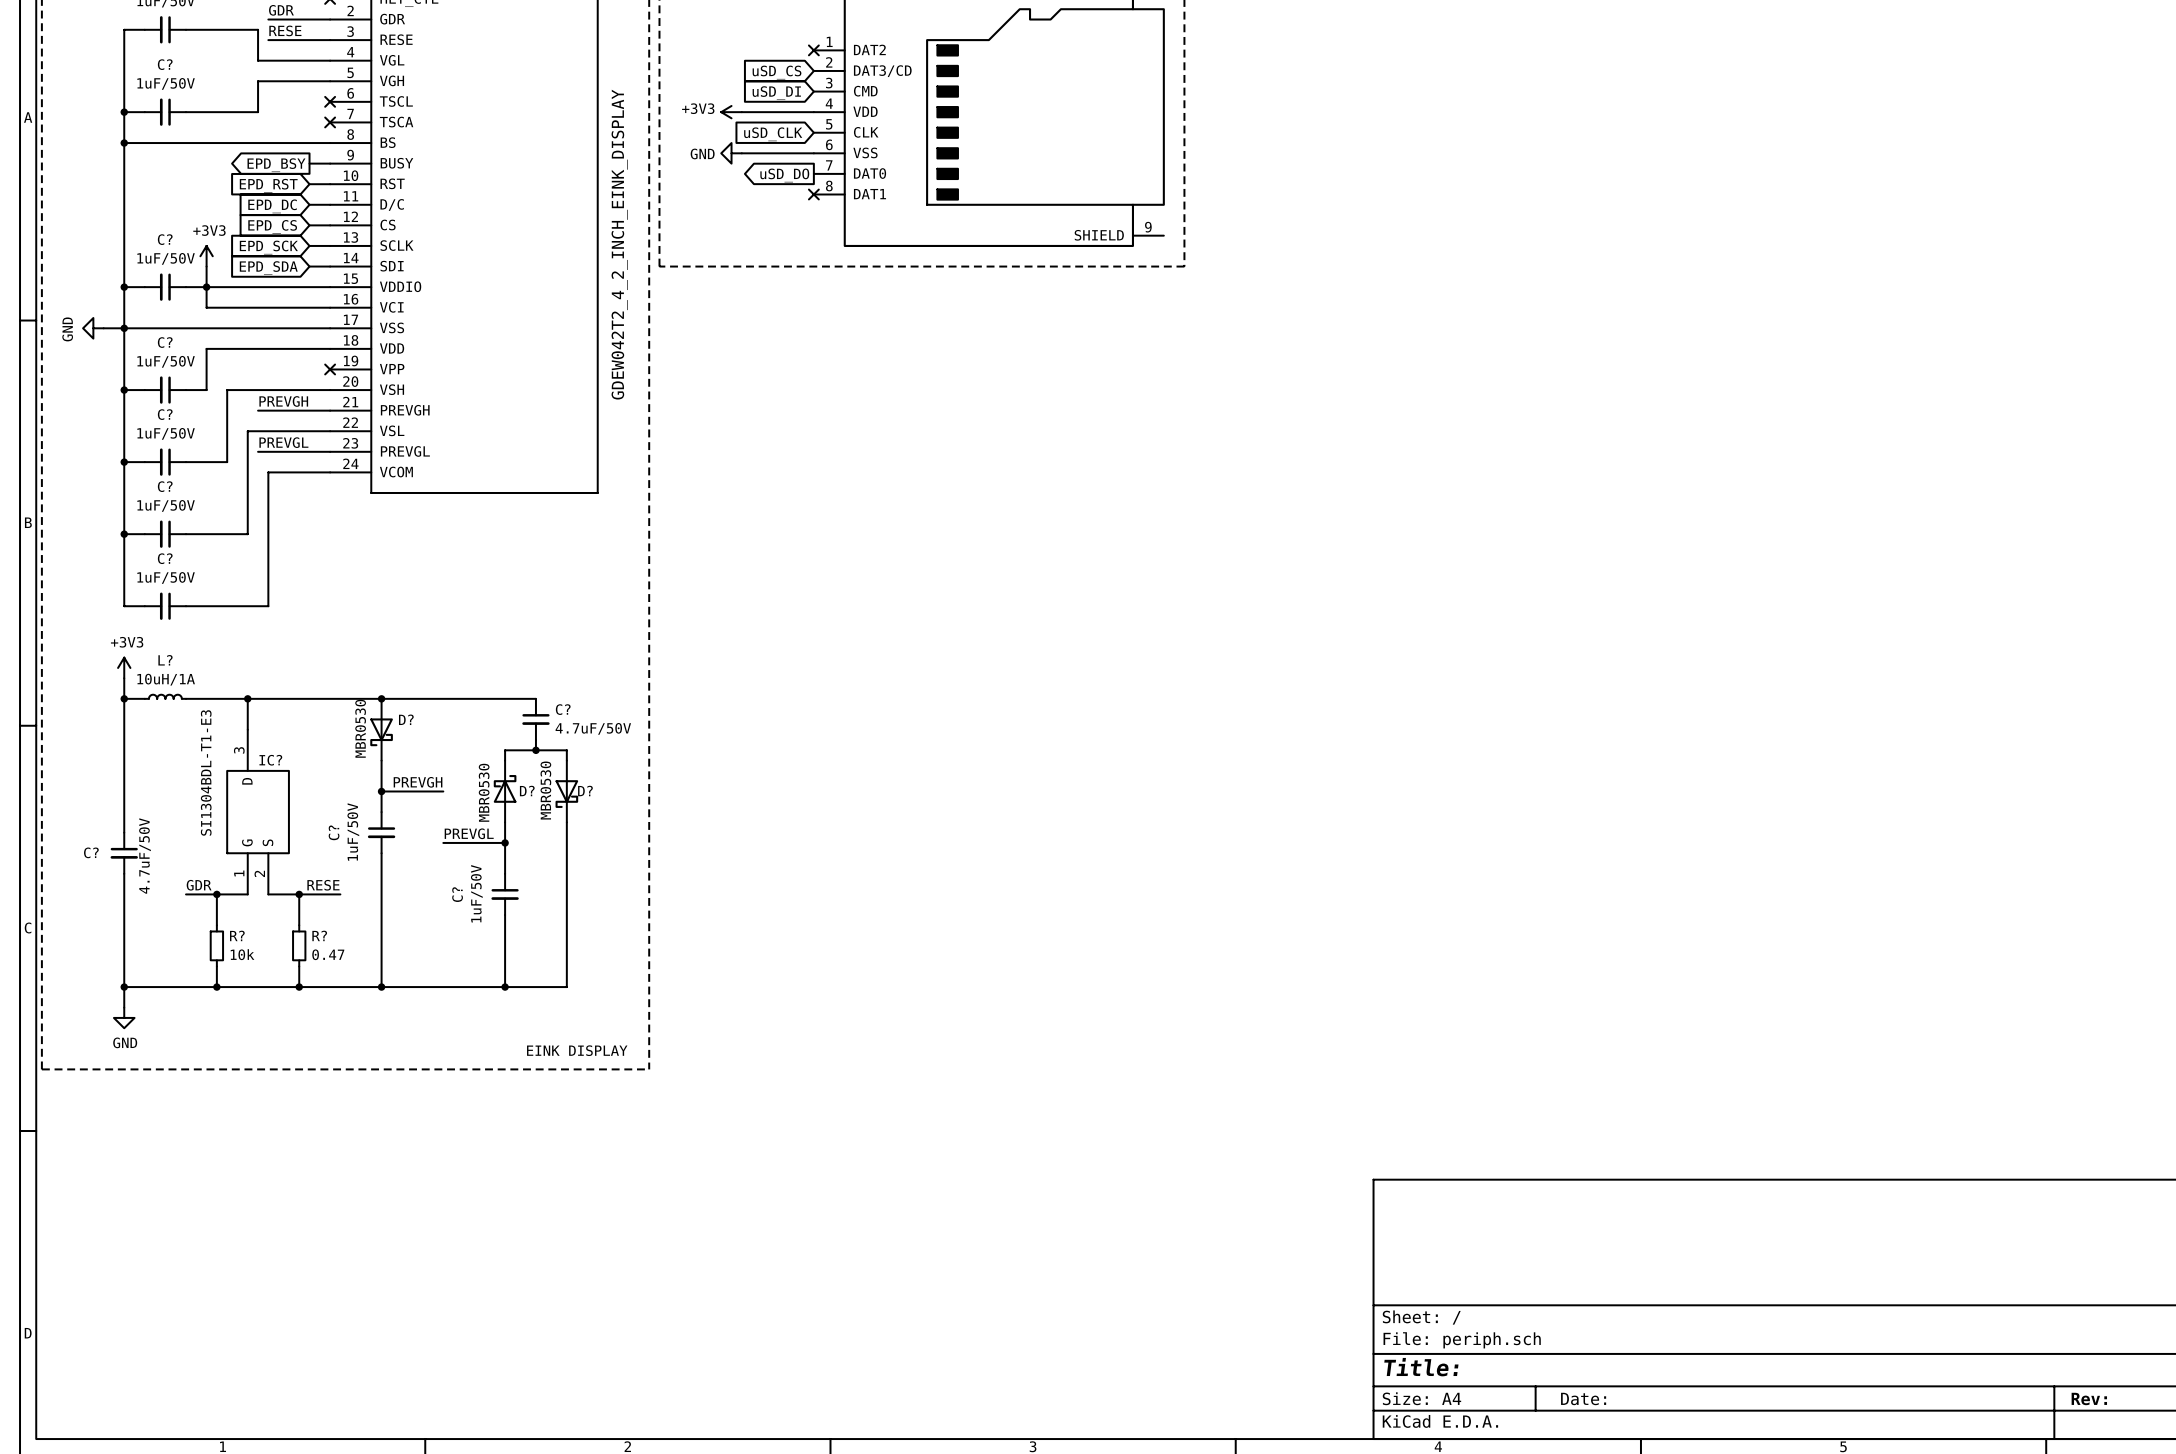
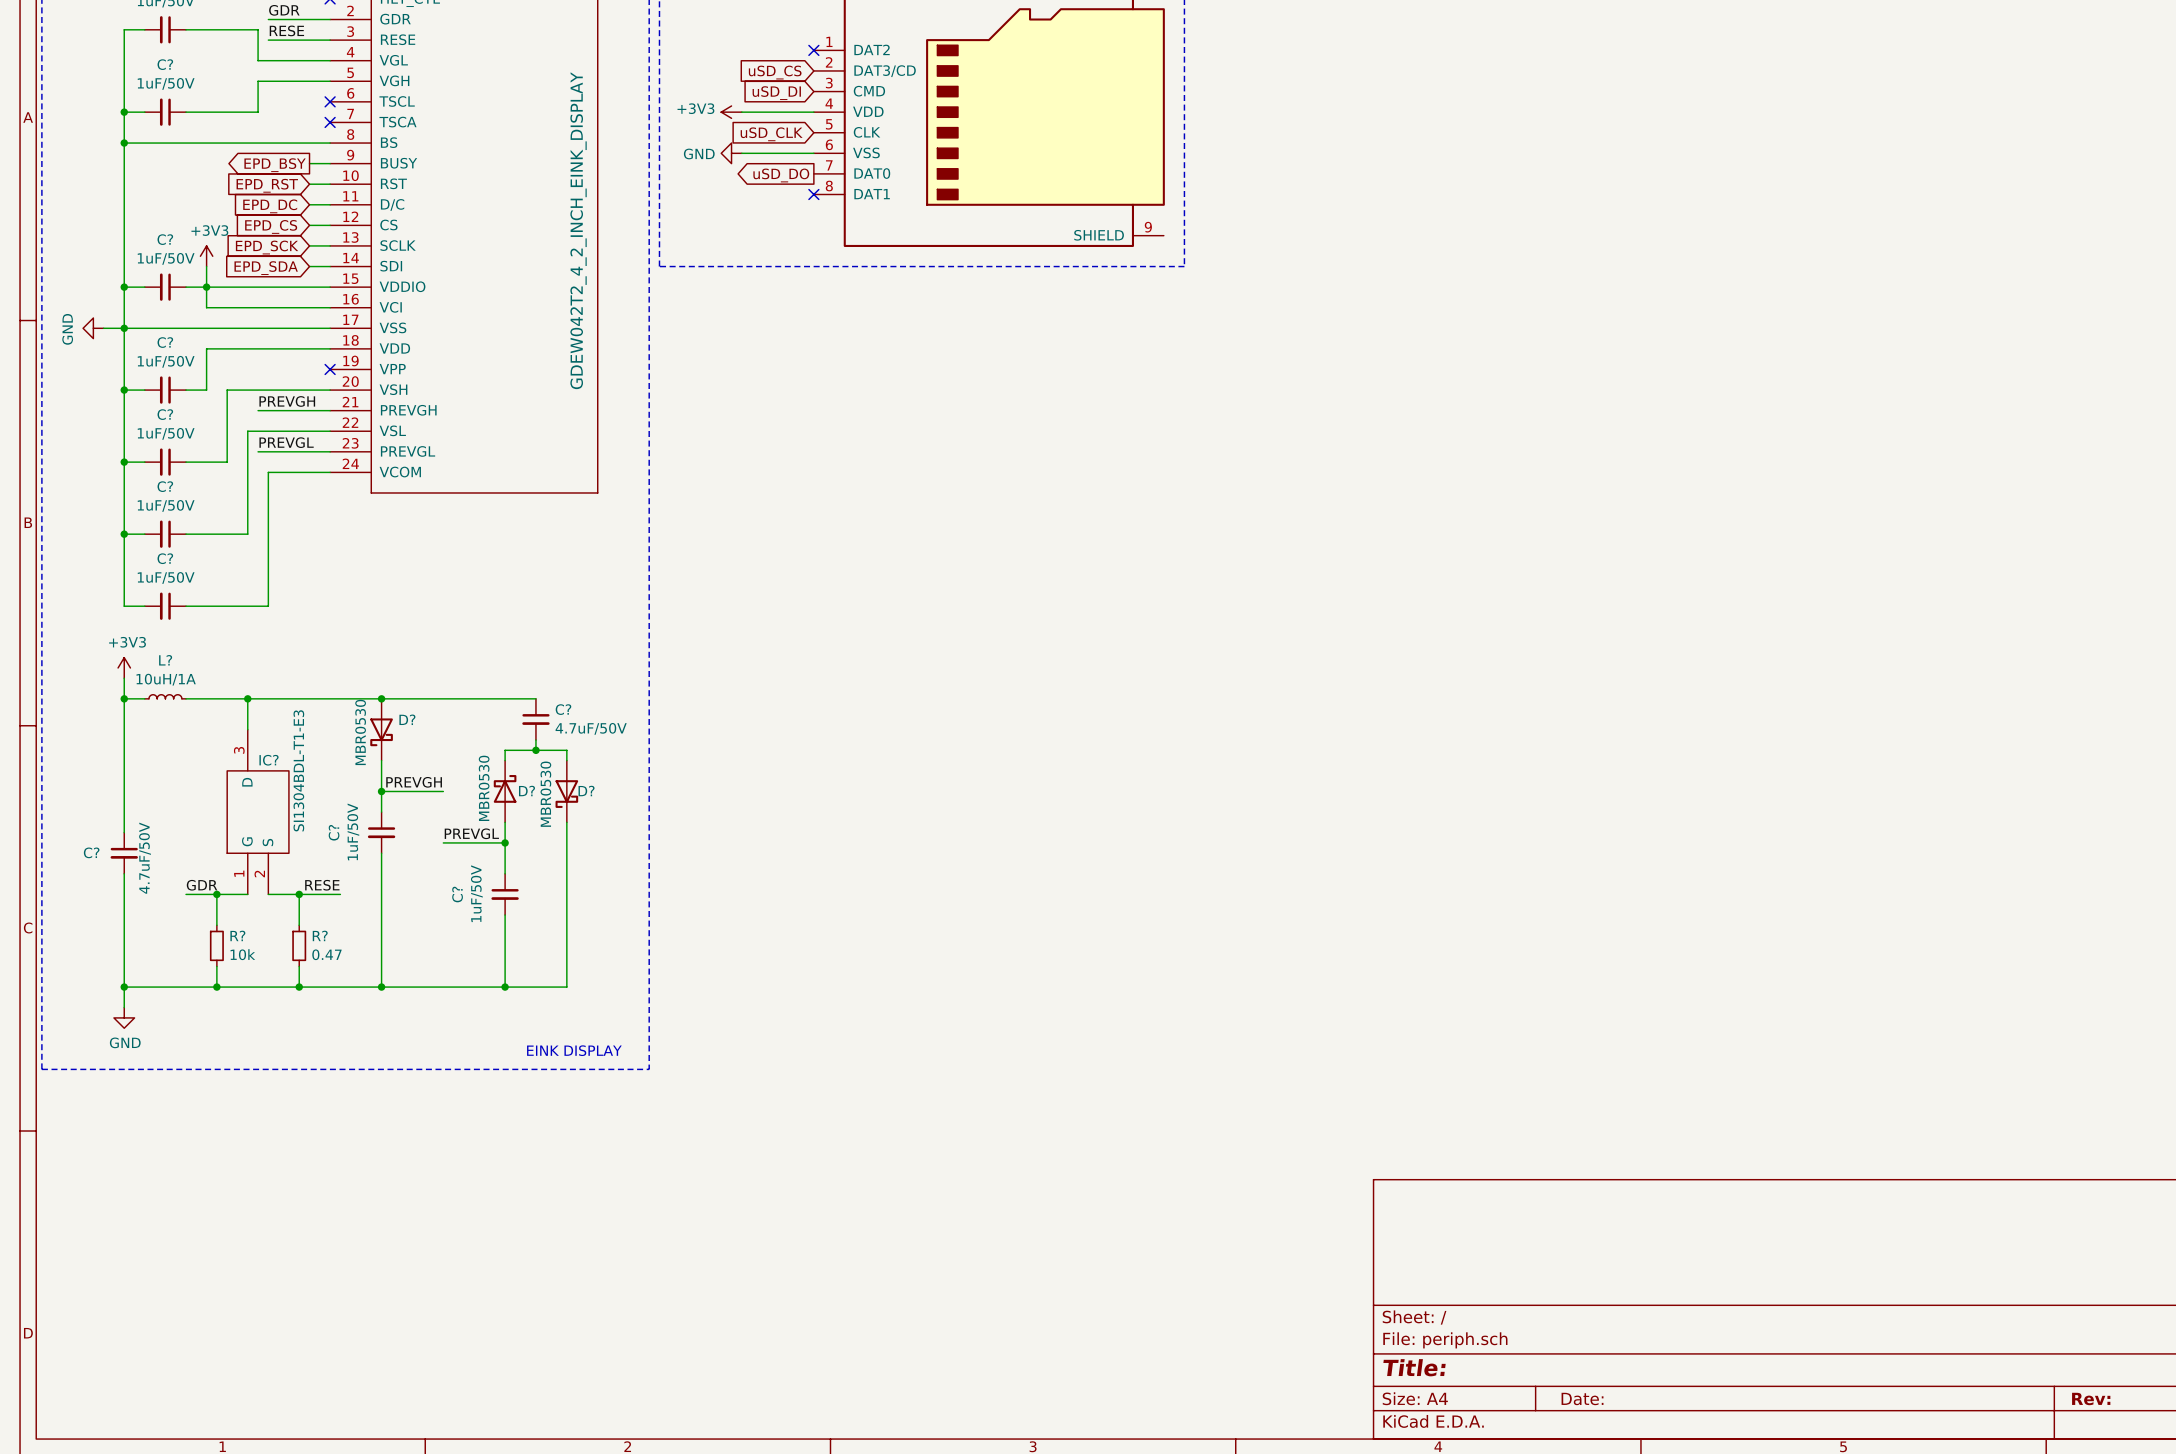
part value position: GDEW042T2_4_2_INCH_EINK_DISPLAY (619, 244) -> GDEW042T2_4_2_INCH_EINK_DISPLAY (578, 230)
IC? value position: SI1304BDL-T1-E3 (206, 772) -> SI1304BDL-T1-E3 (298, 770)

